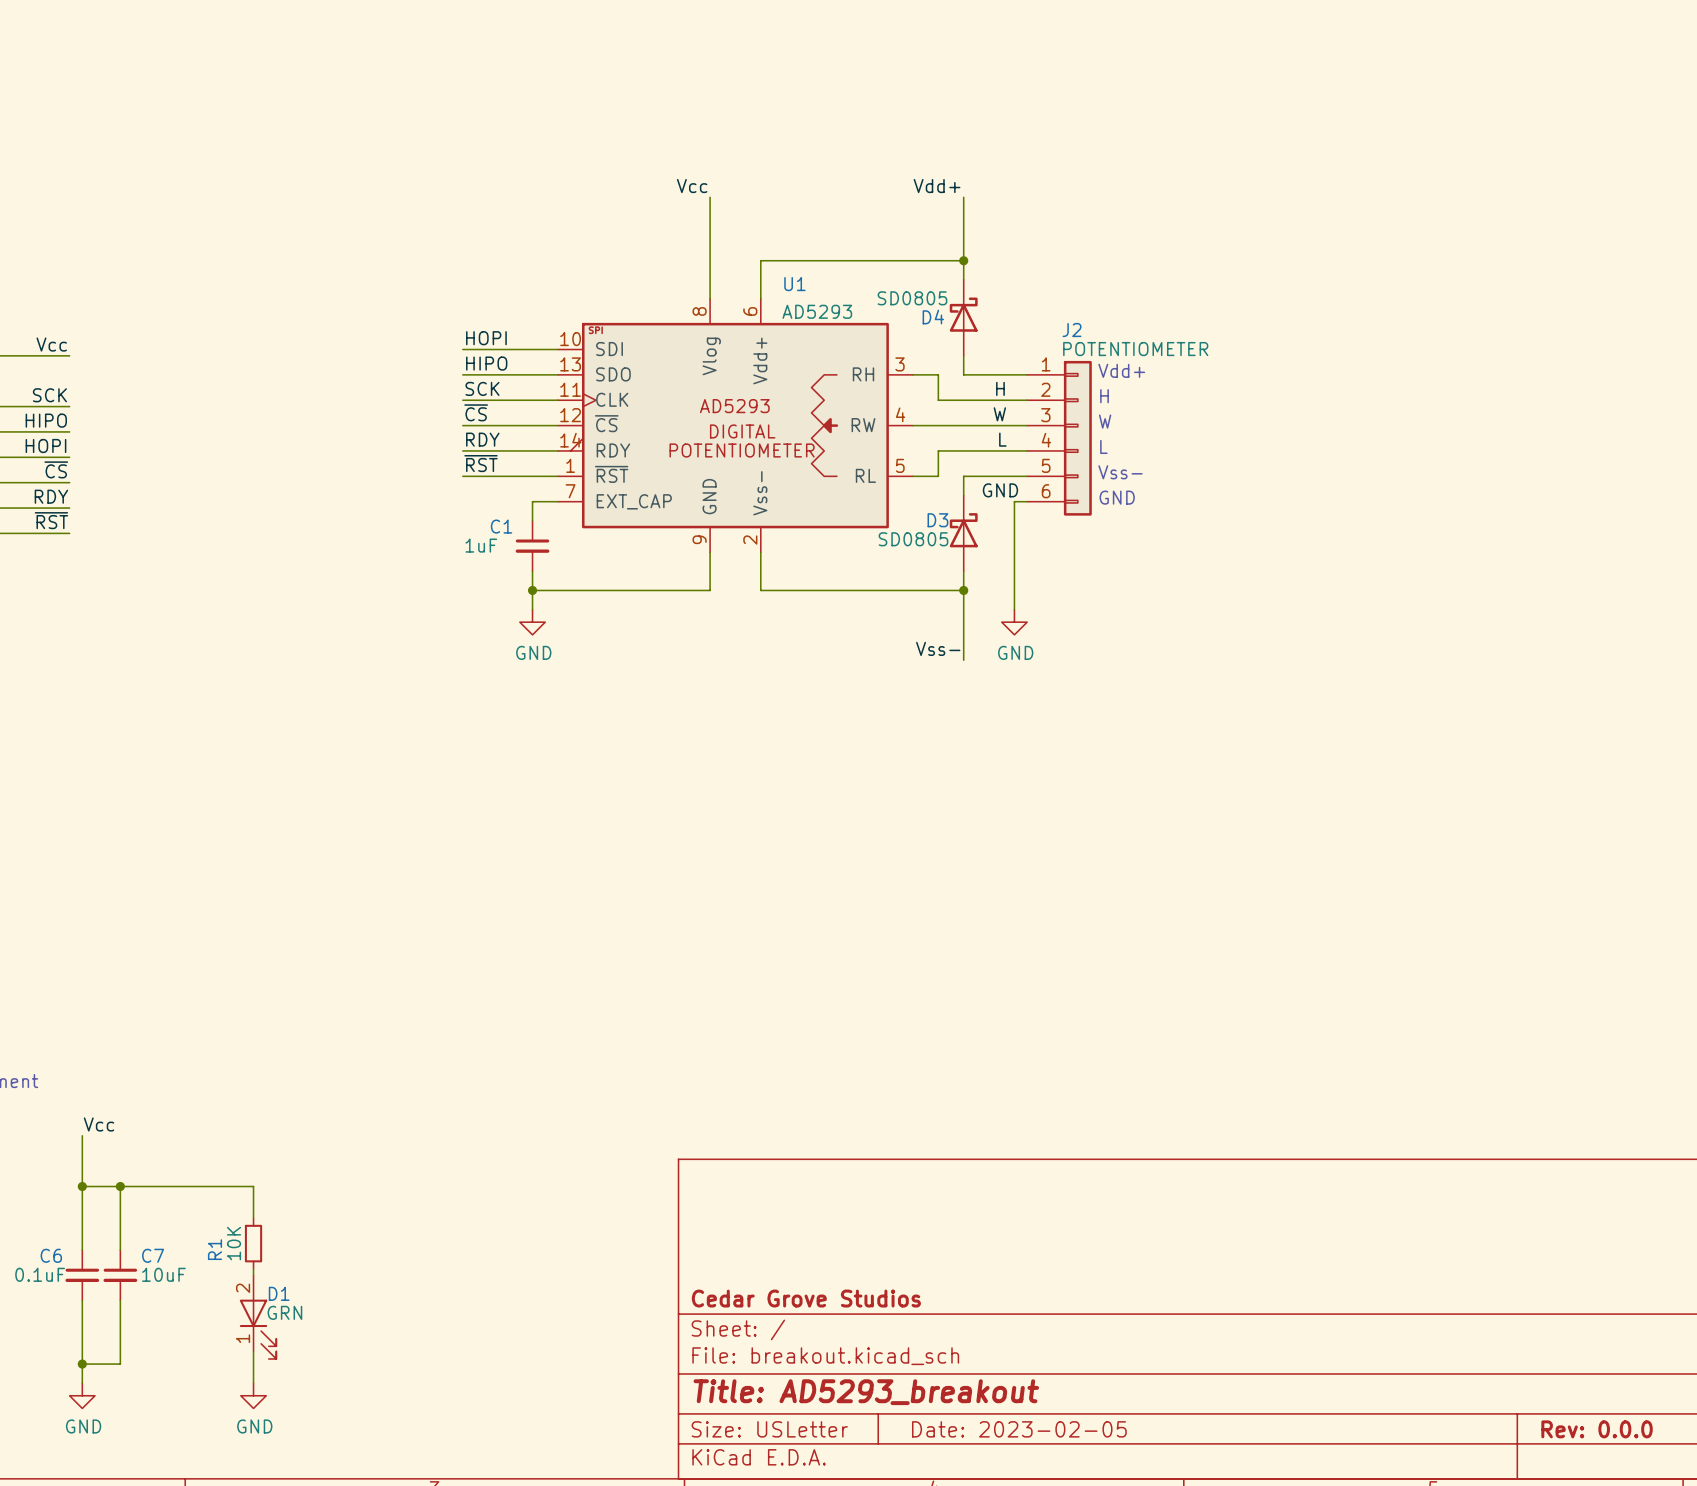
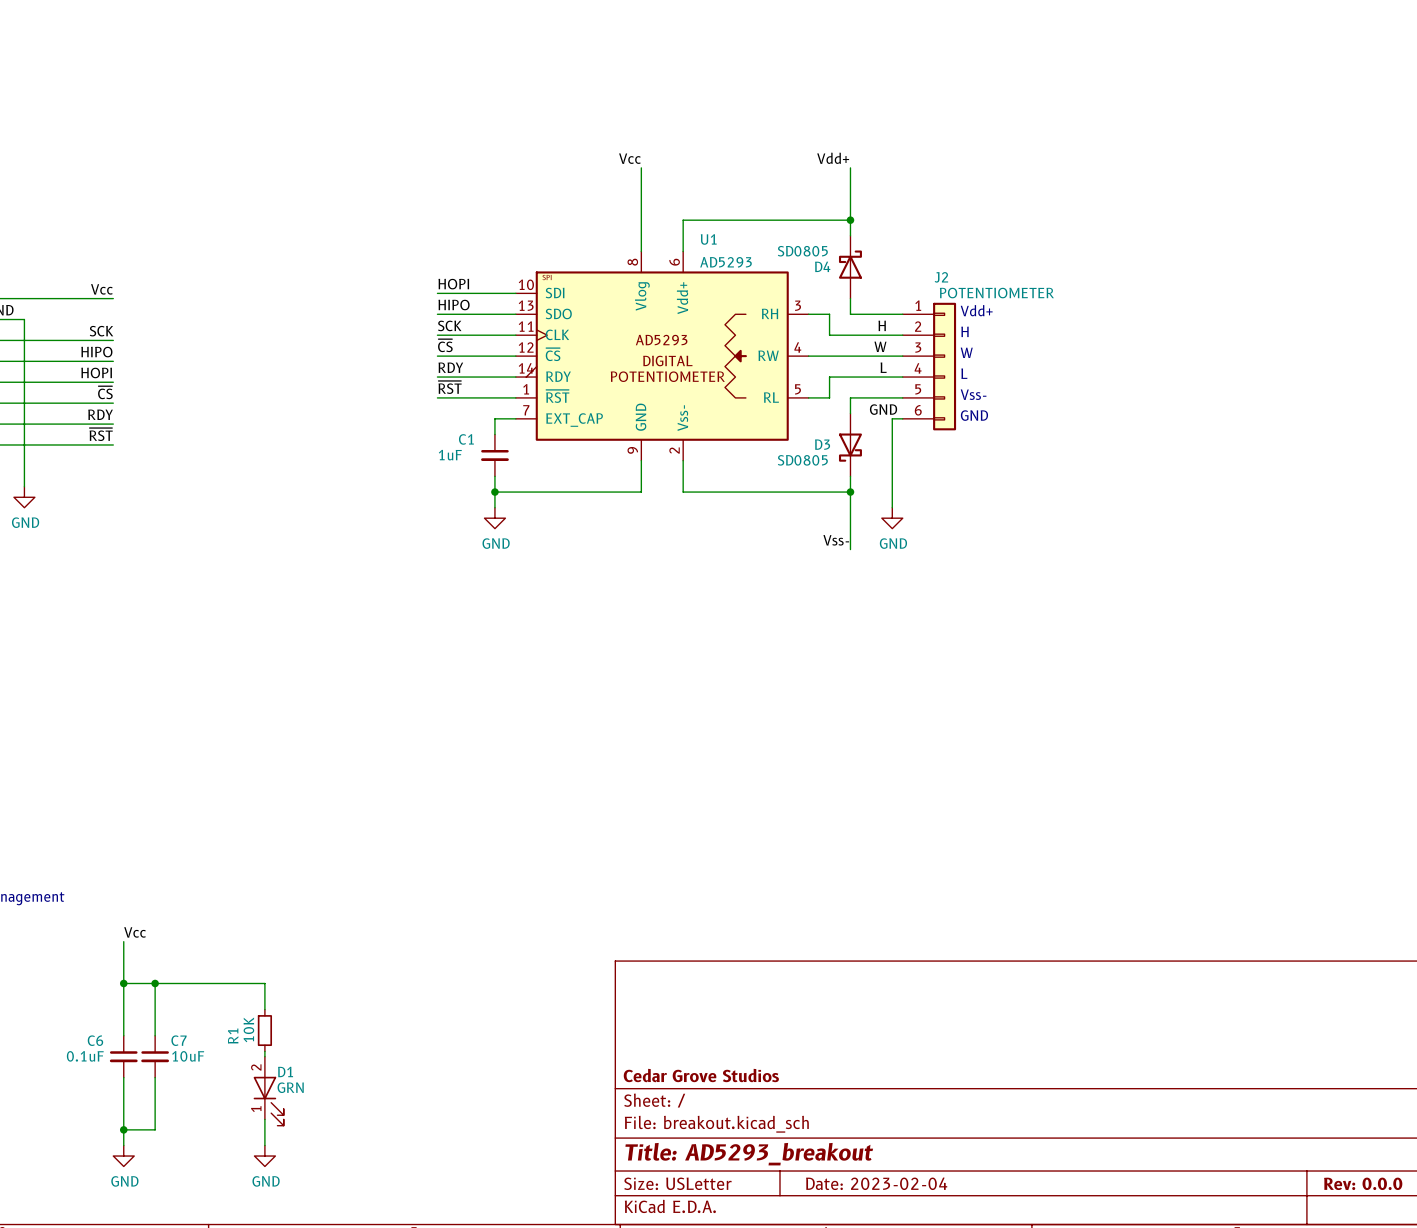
D3 rotation: 0° (963, 530) -> 180° (850, 447)
title block: Date: 2023-02-05 (1019, 1429) -> Date: 2023-02-04 (876, 1183)

